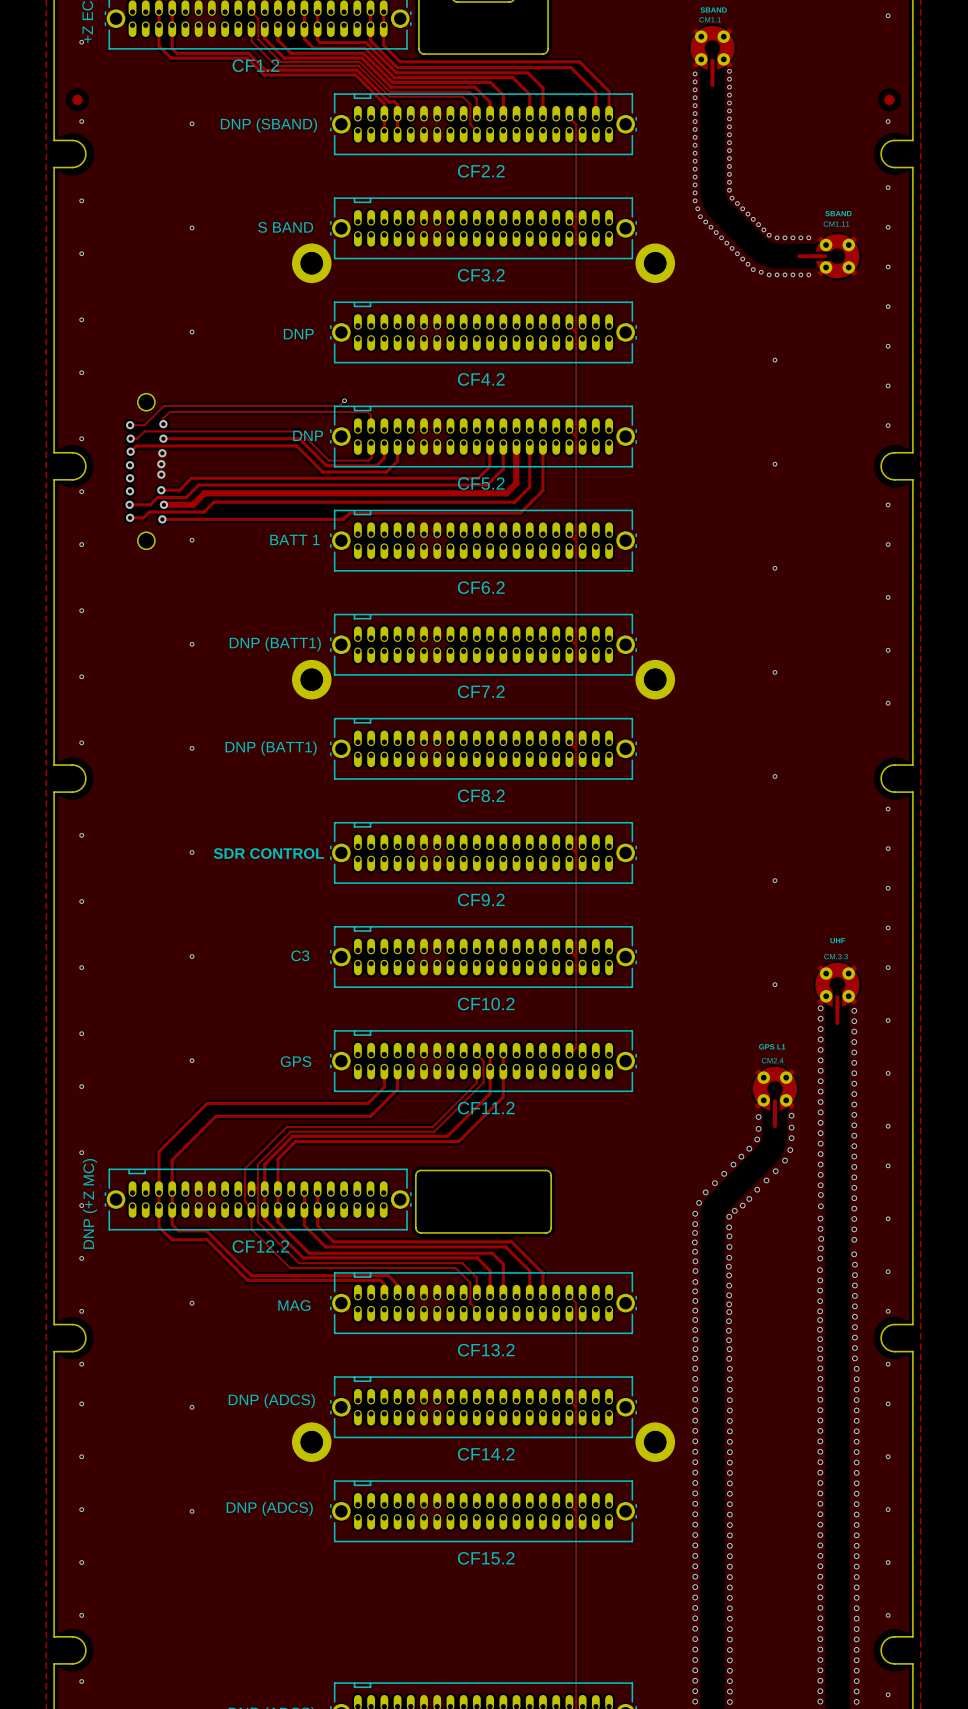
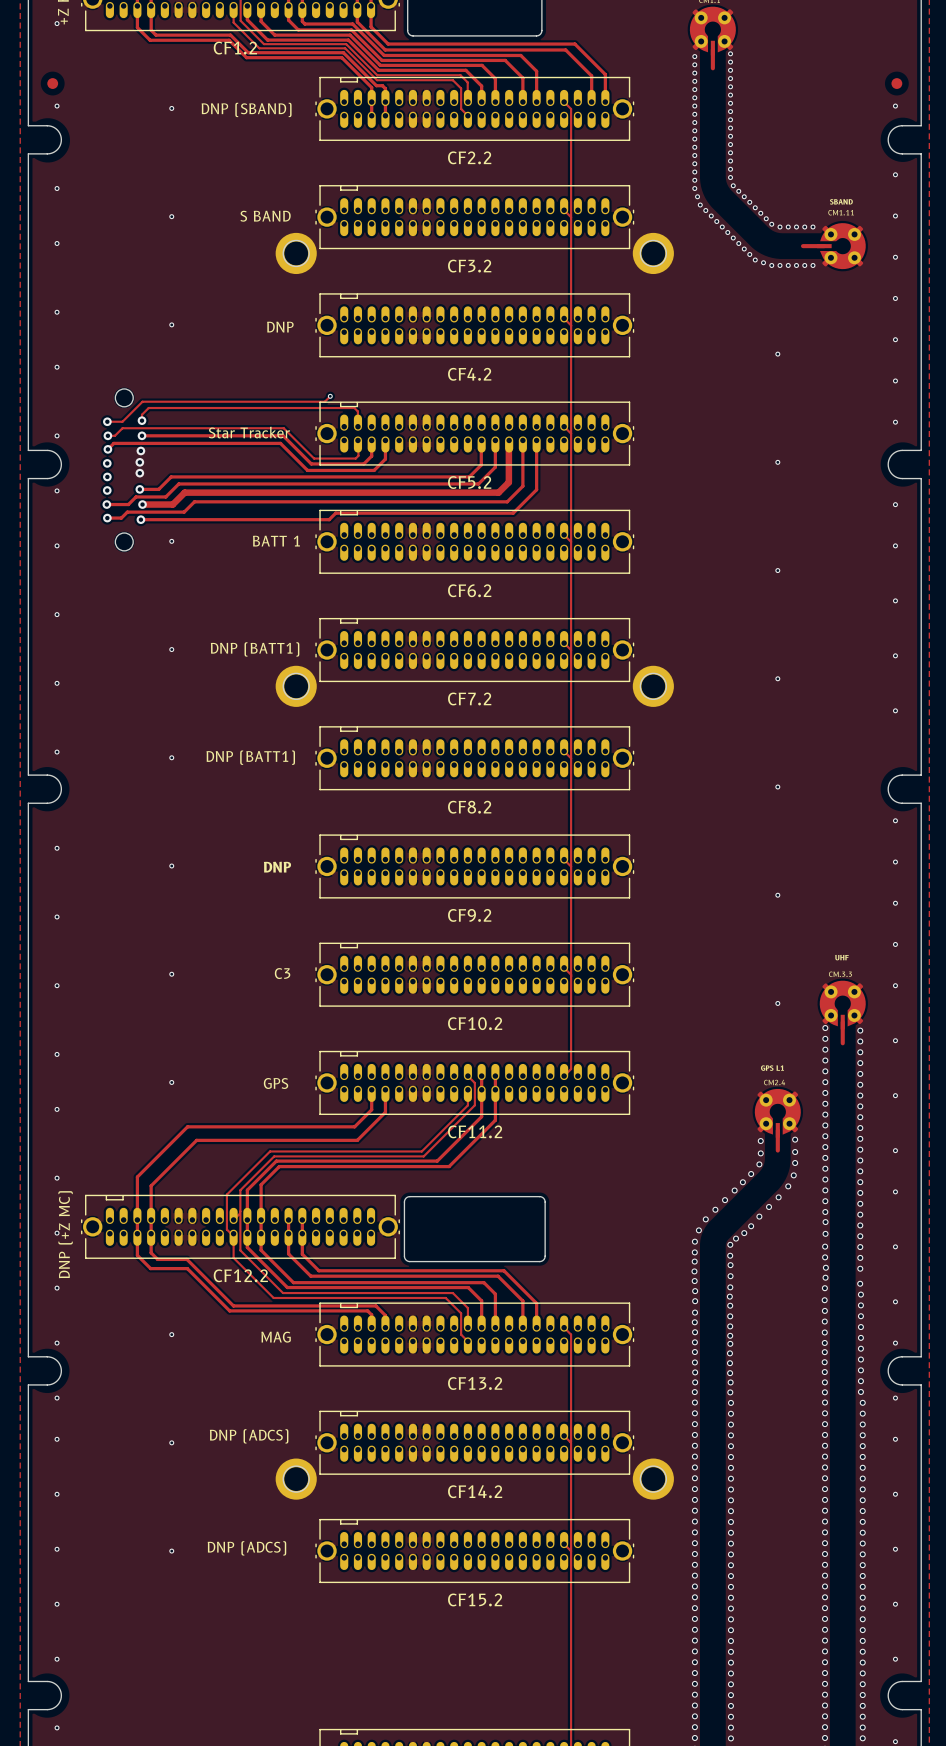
text: none -> Star Tracker (249, 432)
text: DNP (308, 435) -> none
text: SDR CONTROL (268, 853) -> none
text: none -> DNP (277, 867)

